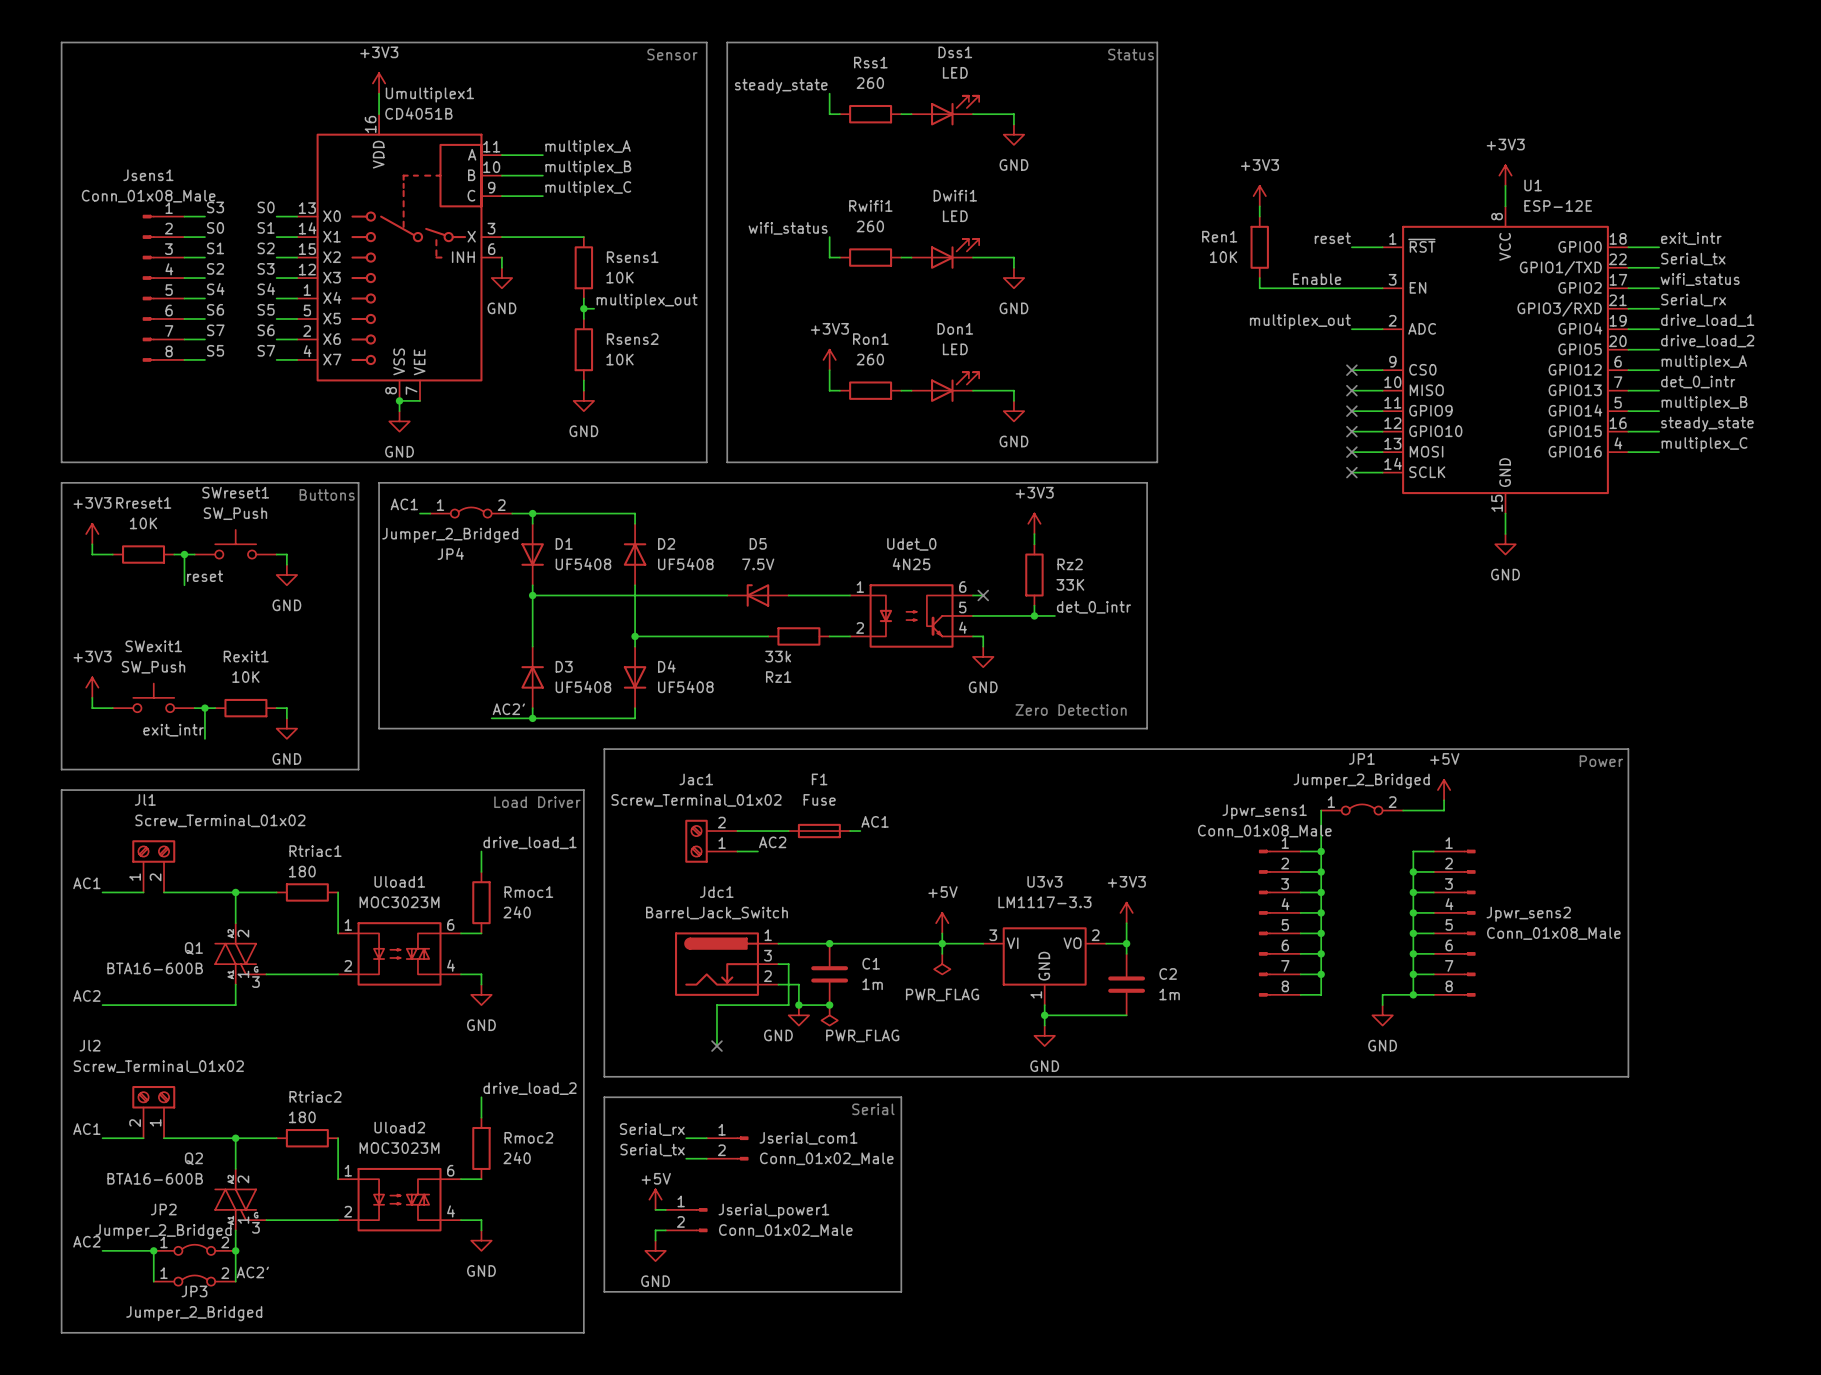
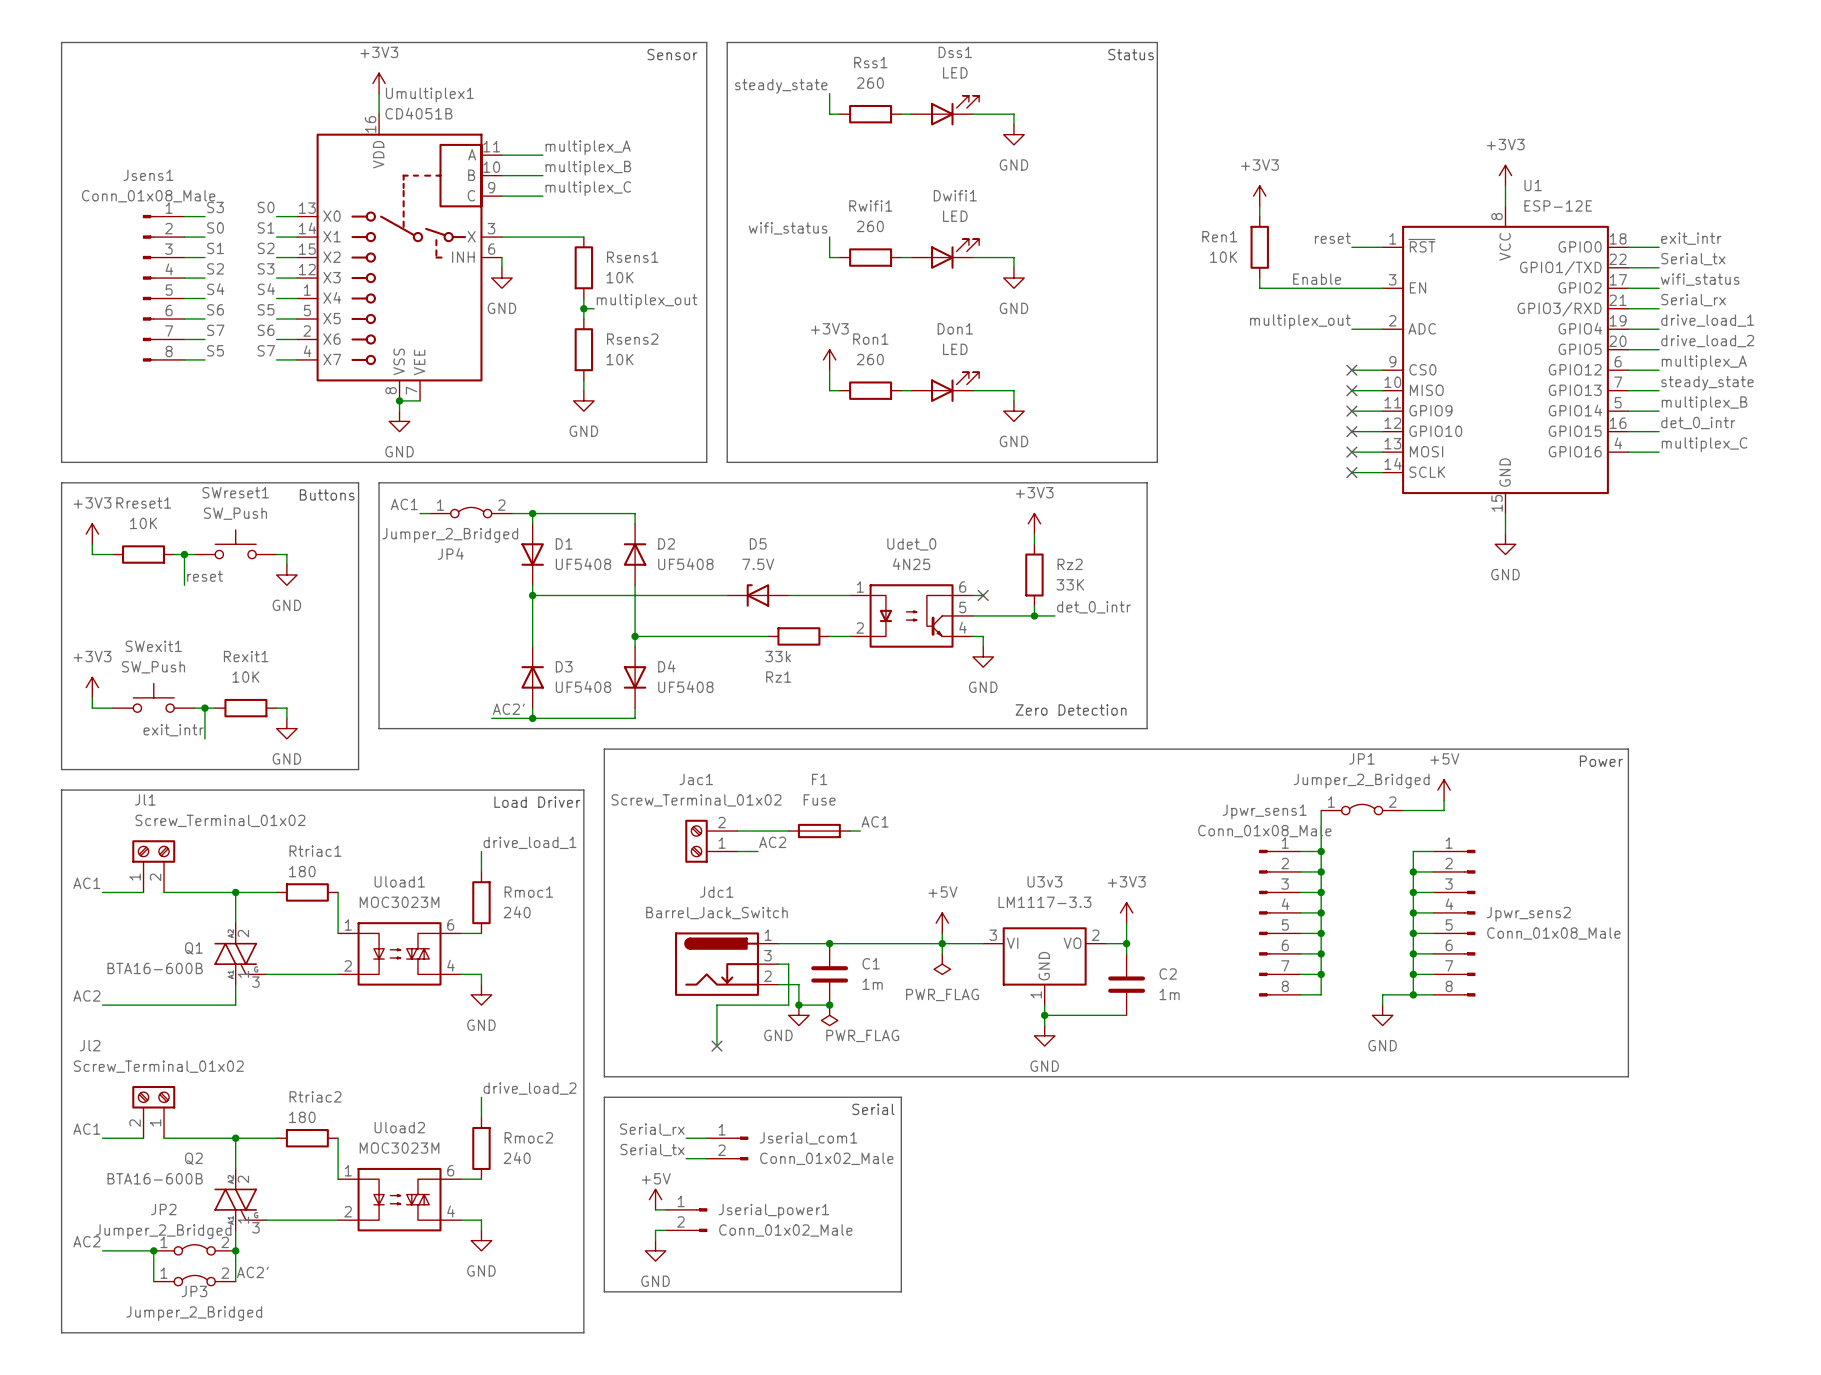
label: det_0_intr (1698, 382) -> steady_state (1707, 383)
label: steady_state (1707, 424) -> det_0_intr (1698, 422)

